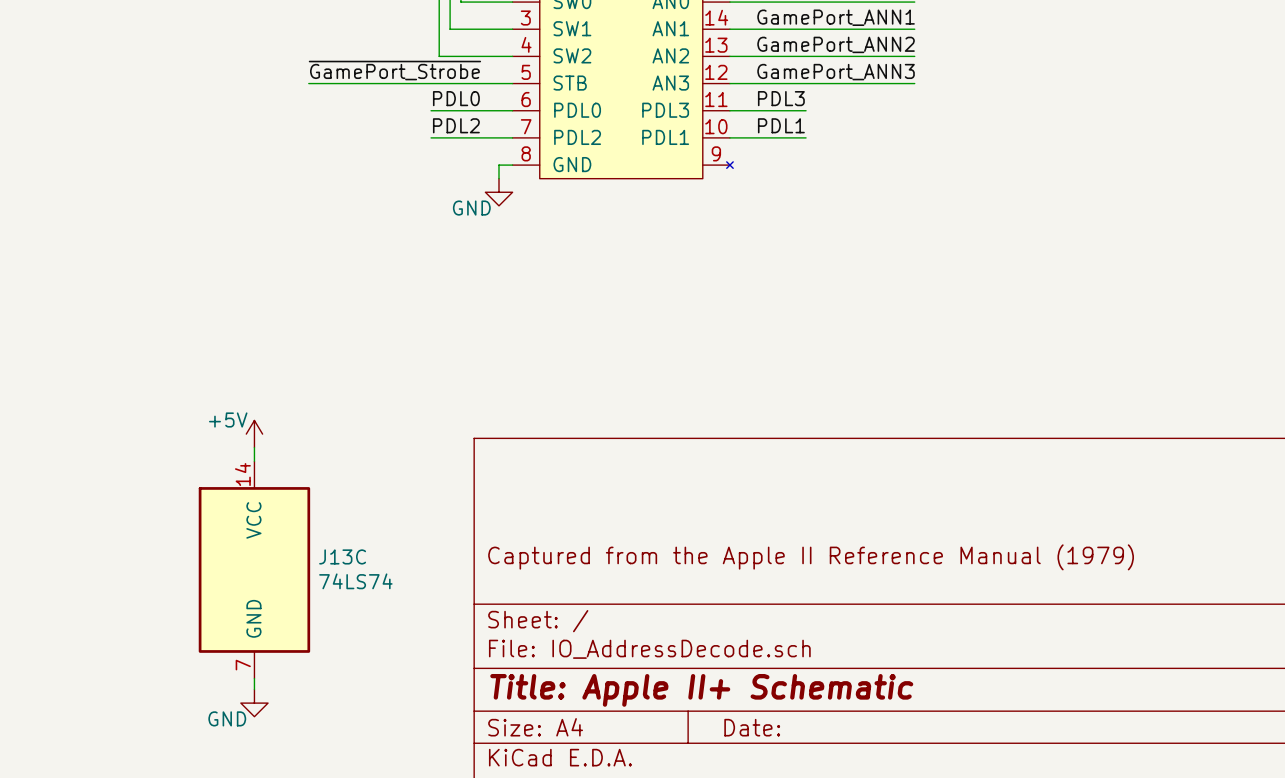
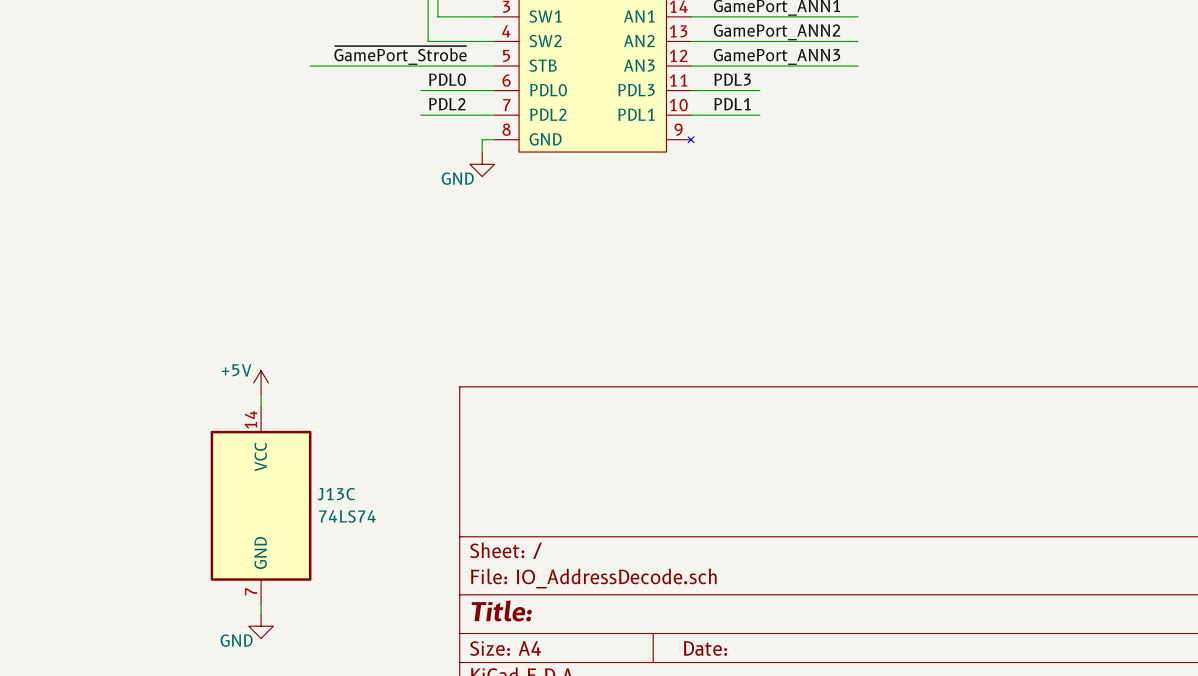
title block: Captured from the Apple II Reference Manual (1979) (811, 557) -> none
title block: Title: Apple II+ Schematic (701, 690) -> Title: (501, 610)

